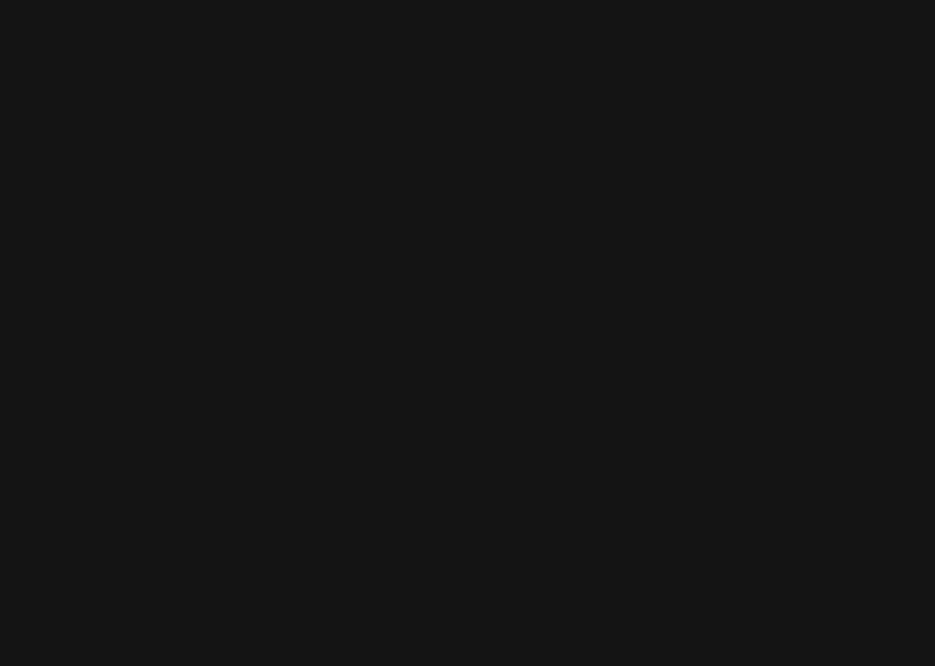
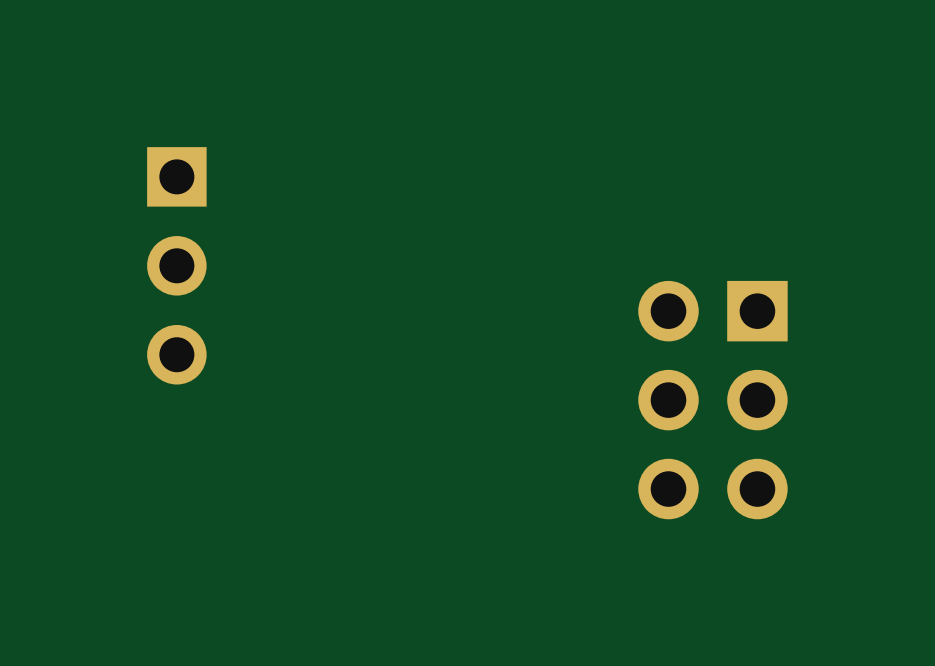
part: none -> (176, 265)
part: none -> (712, 400)

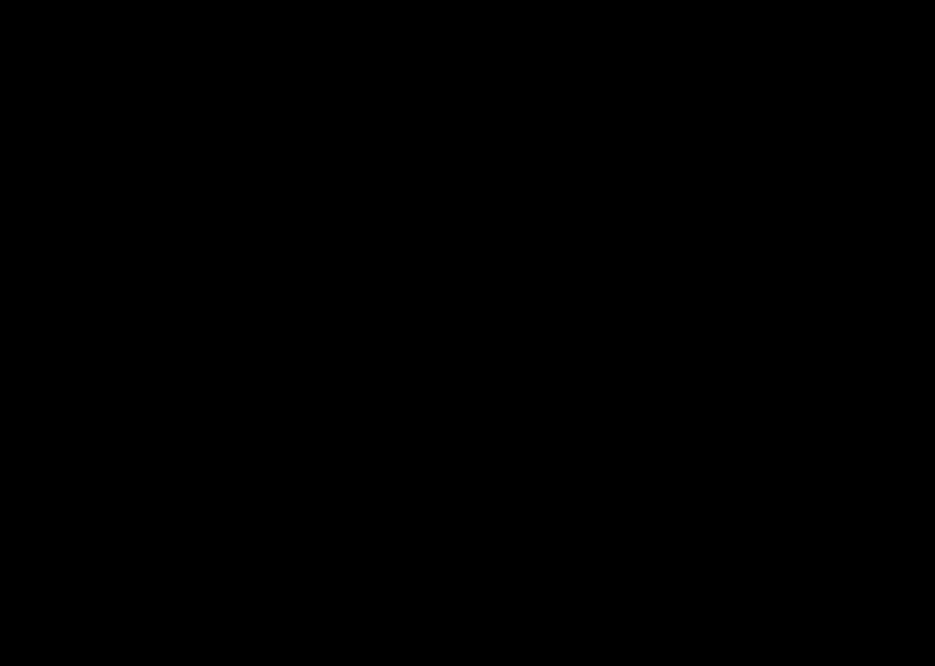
part: (176, 265) -> none
part: (712, 400) -> none

